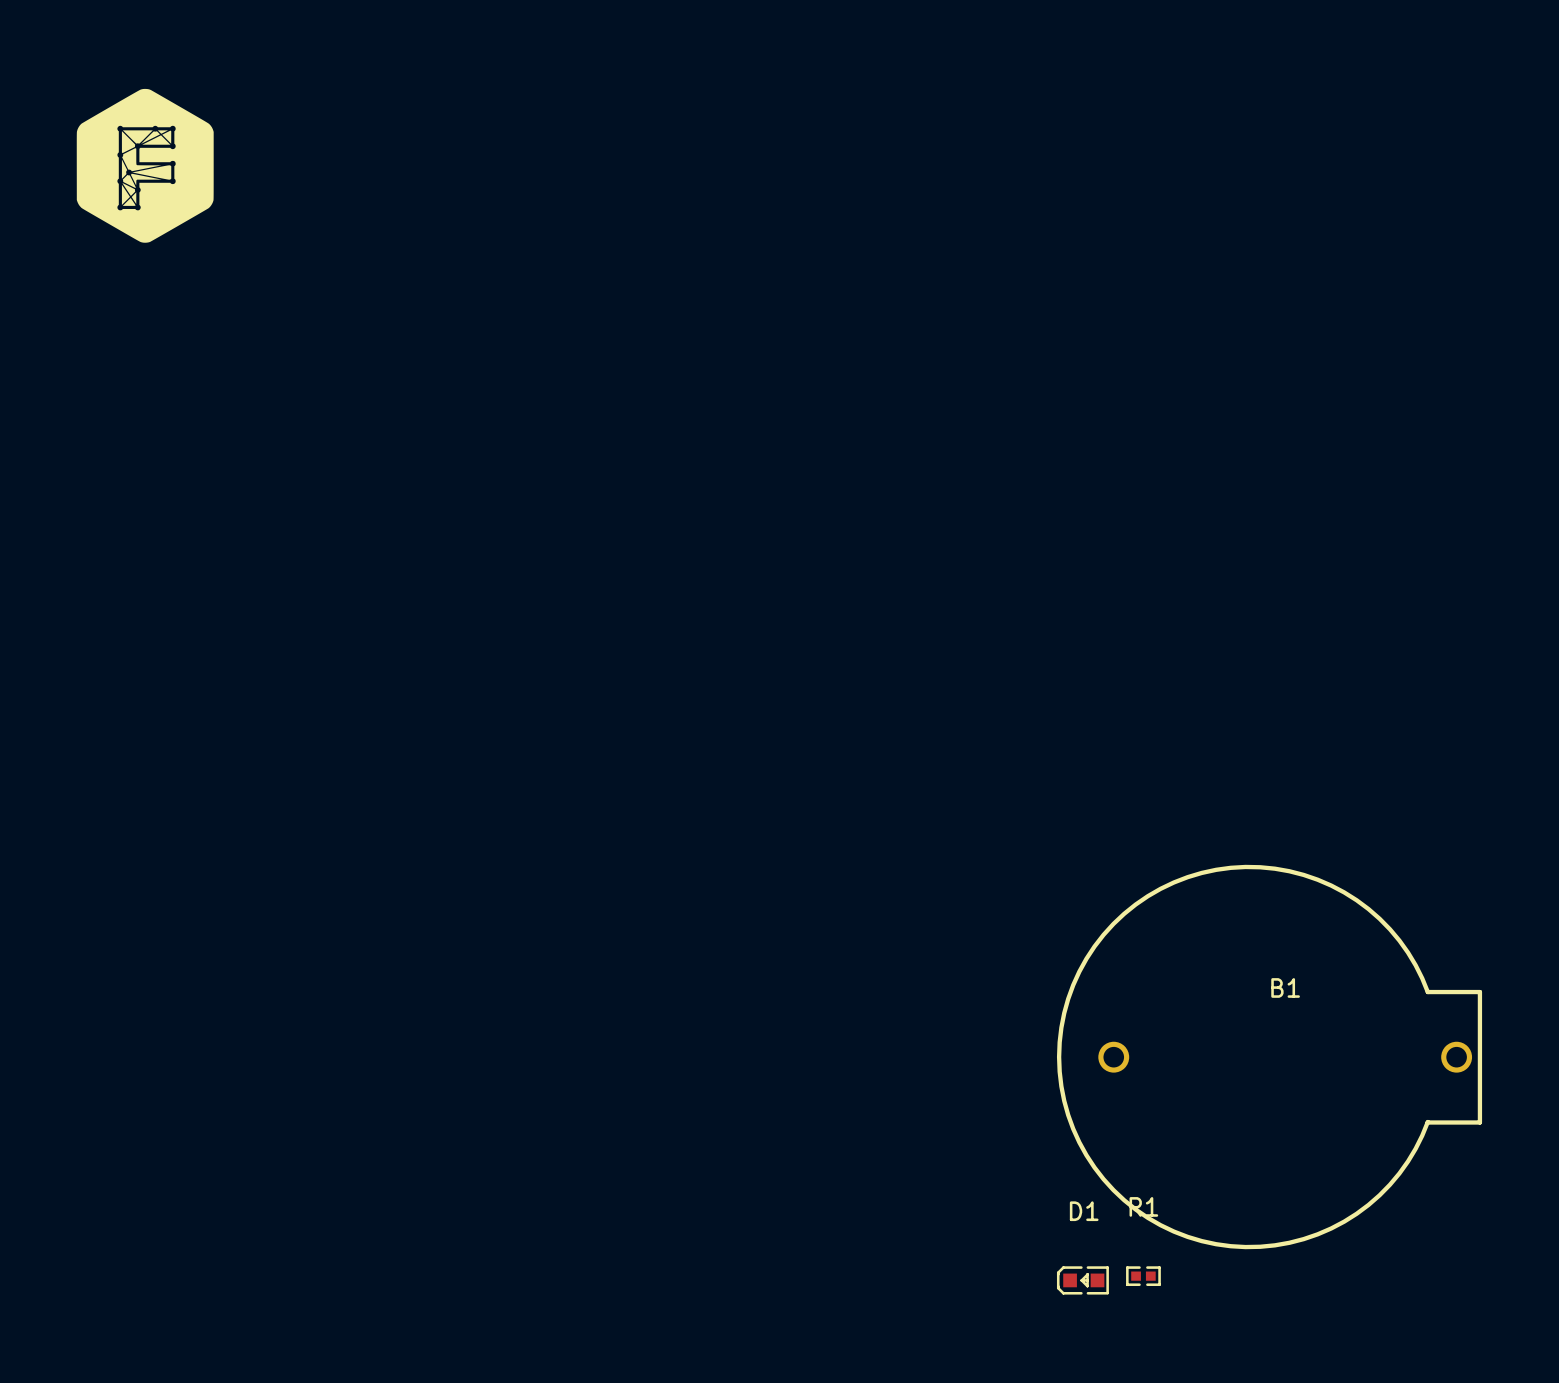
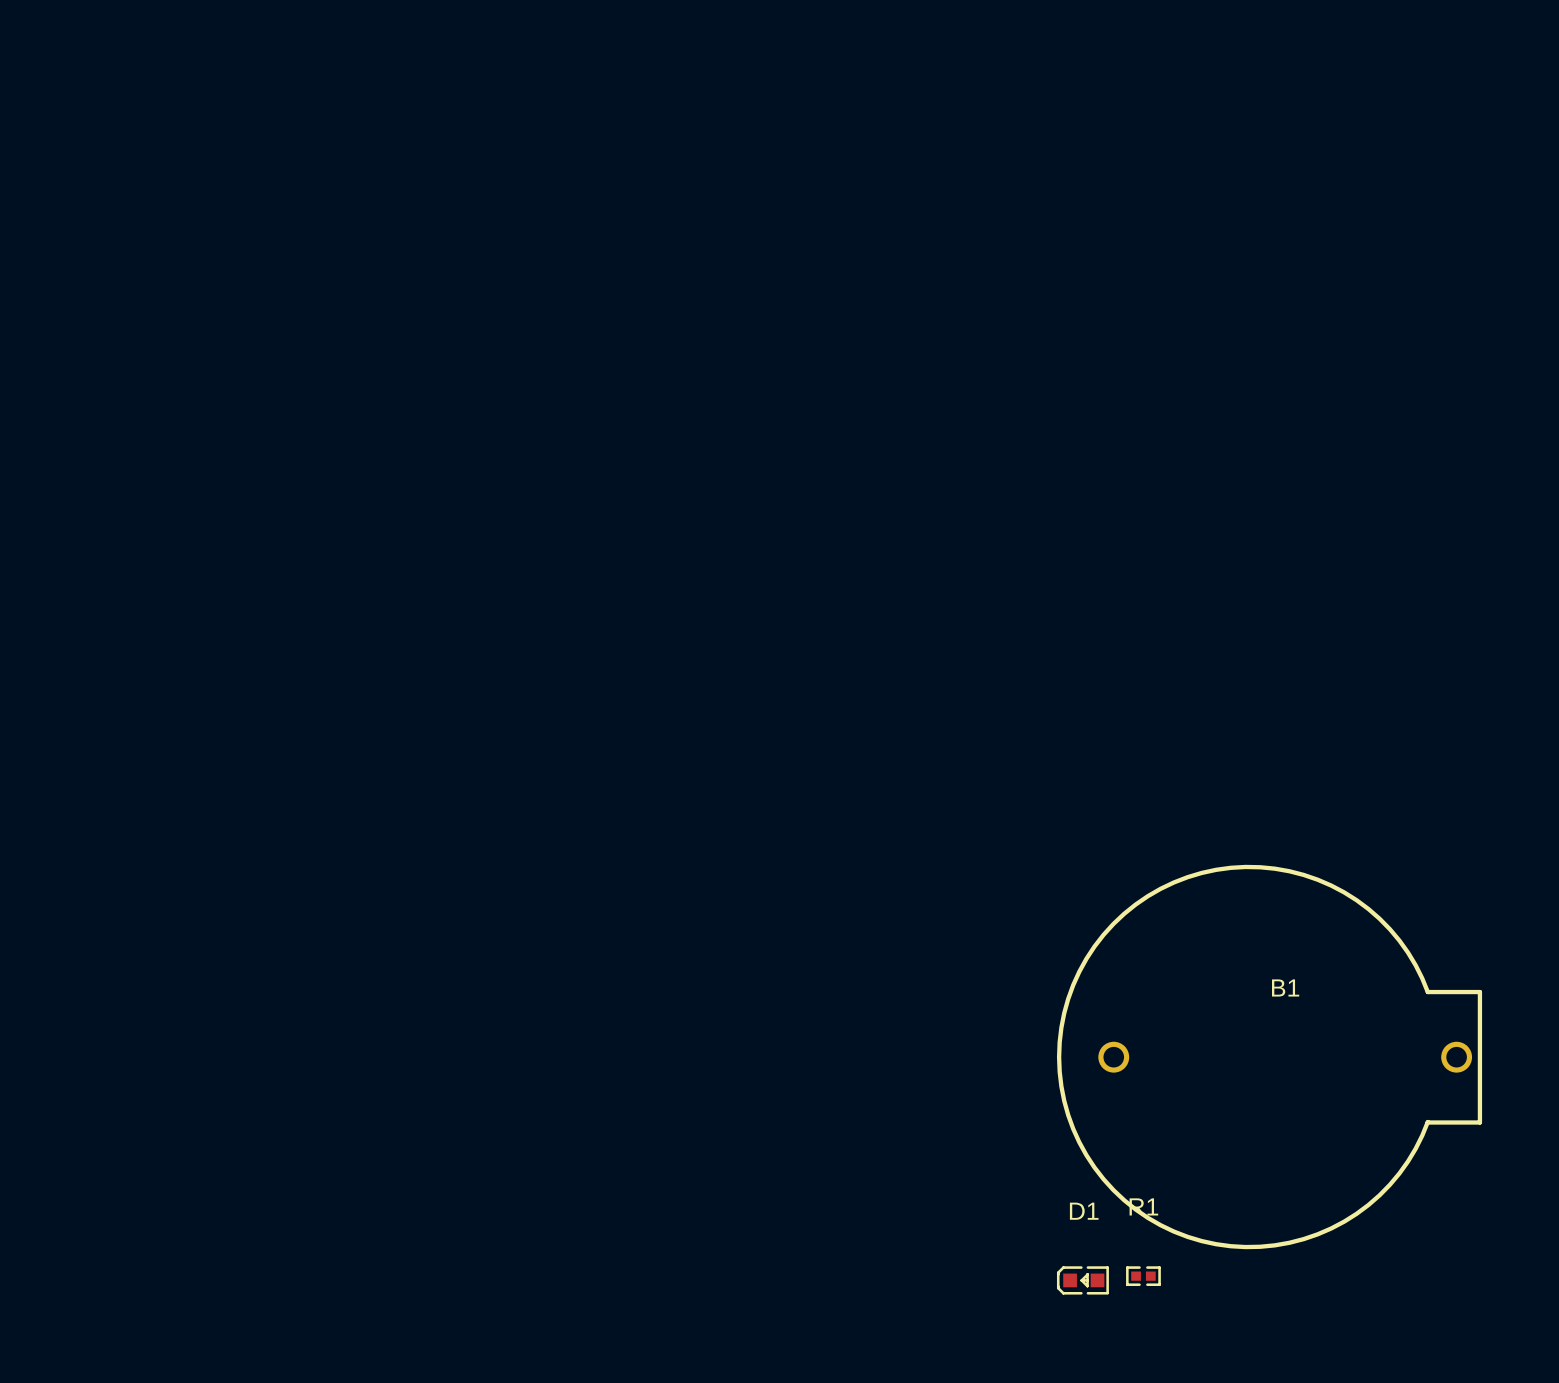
drawing: [76, 88, 214, 243] -> none

